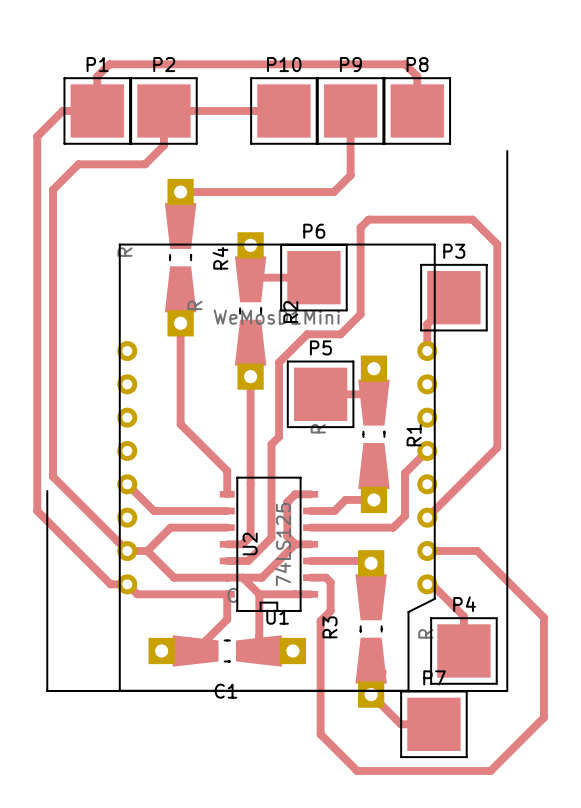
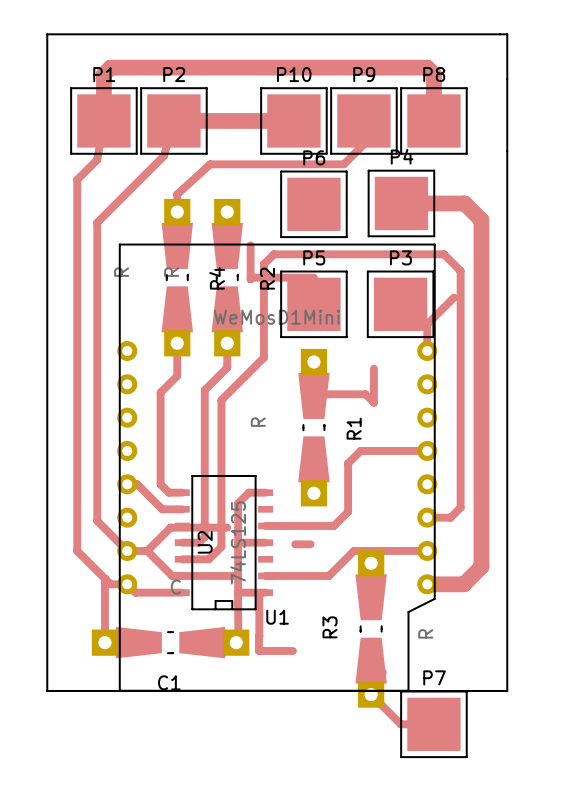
P1 position: (97, 110) -> (103, 120)
P2 position: (163, 110) -> (173, 120)
top track: (283, 110) (163, 110) (163, 145) (145, 164) (78, 164) (53, 189) (53, 476) (97, 520) -> (293, 120) (173, 120) (163, 155) (97, 222) (97, 520)
P10 position: (283, 110) -> (293, 120)
top track: (350, 110) (350, 175) (333, 192) (180, 192) (180, 225) -> none
P9 position: (350, 110) -> (363, 120)
top track: (417, 110) (417, 76) (405, 64) (109, 64) (97, 76) (97, 110) (62, 110) (37, 136) (37, 510) (77, 550) -> (433, 120) (433, 74) (427, 67) (110, 67) (103, 74) (103, 120) (97, 159) (77, 179) (77, 550)
P8 position: (417, 110) -> (433, 120)
top track: none -> (363, 120) (363, 144) (343, 164) (210, 164) (177, 194) (177, 244)
board edge: none -> (507, 150) (507, 34) (47, 34) (47, 490)
top track: none -> (401, 203) (464, 203) (481, 220) (481, 566) (463, 584) (427, 584)
R4 position: (180, 257) -> (177, 277)
P6 position: (313, 277) -> (313, 204)
top track: (180, 289) (180, 424) (227, 470) (227, 494) -> none
P3 position: (453, 297) -> (400, 304)
top track: none -> (177, 307) (177, 375) (160, 392) (160, 484) (168, 492) (182, 492)
top track: none -> (227, 309) (227, 367) (204, 390) (204, 536) (198, 542) (182, 542)
R2 position: (250, 310) -> (227, 277)
top track: (250, 342) (250, 536) (242, 544) (227, 544) -> none
P5 position: (320, 394) -> (313, 304)
R1 position: (373, 434) -> (313, 427)
top track: (427, 450) (404, 473) (404, 515) (393, 527) (310, 527) -> (427, 450) (360, 450) (348, 463) (348, 511) (333, 525) (265, 525)
top track: (373, 465) (373, 499) (345, 499) (334, 510) (310, 510) -> none
top track: (127, 484) (153, 510) (227, 510) -> (127, 484) (137, 484) (162, 509) (182, 509)
top track: none -> (265, 492) (248, 492) (238, 503) (238, 634) (236, 642) (202, 642)
top track: (310, 494) (295, 494) (287, 502) (287, 536) (295, 544) (261, 577) (173, 577) (172, 575) -> (238, 575) (172, 575)
top track: (427, 517) (497, 447) (497, 244) (472, 219) (368, 219) (360, 227) (360, 314) (340, 334) (307, 334) (279, 362) (279, 436) (271, 444) (271, 537) (248, 560) (227, 560) -> (427, 517) (450, 517) (460, 507) (460, 270) (443, 254) (273, 254) (263, 264) (263, 357) (221, 400) (221, 546) (208, 559) (182, 559)
top track: none -> (238, 542) (265, 542)
U2 position: (268, 544) -> (223, 542)
top track: none -> (427, 550) (353, 550) (328, 575) (265, 575)
top track: (428, 550) (477, 550) (543, 617) (543, 717) (490, 770) (357, 770) (320, 734) (320, 620) (330, 610) (330, 582) (325, 577) (310, 577) -> none
top track: (310, 560) (368, 560) (371, 563) (371, 597) -> none
top track: (242, 577) (259, 594) (310, 594) -> none
top track: none -> (104, 578) (104, 642) (138, 642)
top track: (431, 584) (463, 616) (463, 650) -> none
top track: (135, 592) (137, 594) (227, 594) (227, 619) (195, 650) (161, 650) -> (135, 592) (182, 592)
top track: none -> (238, 592) (265, 592)
C1 position: (227, 650) -> (170, 642)
P4 position: (463, 650) -> (401, 203)

